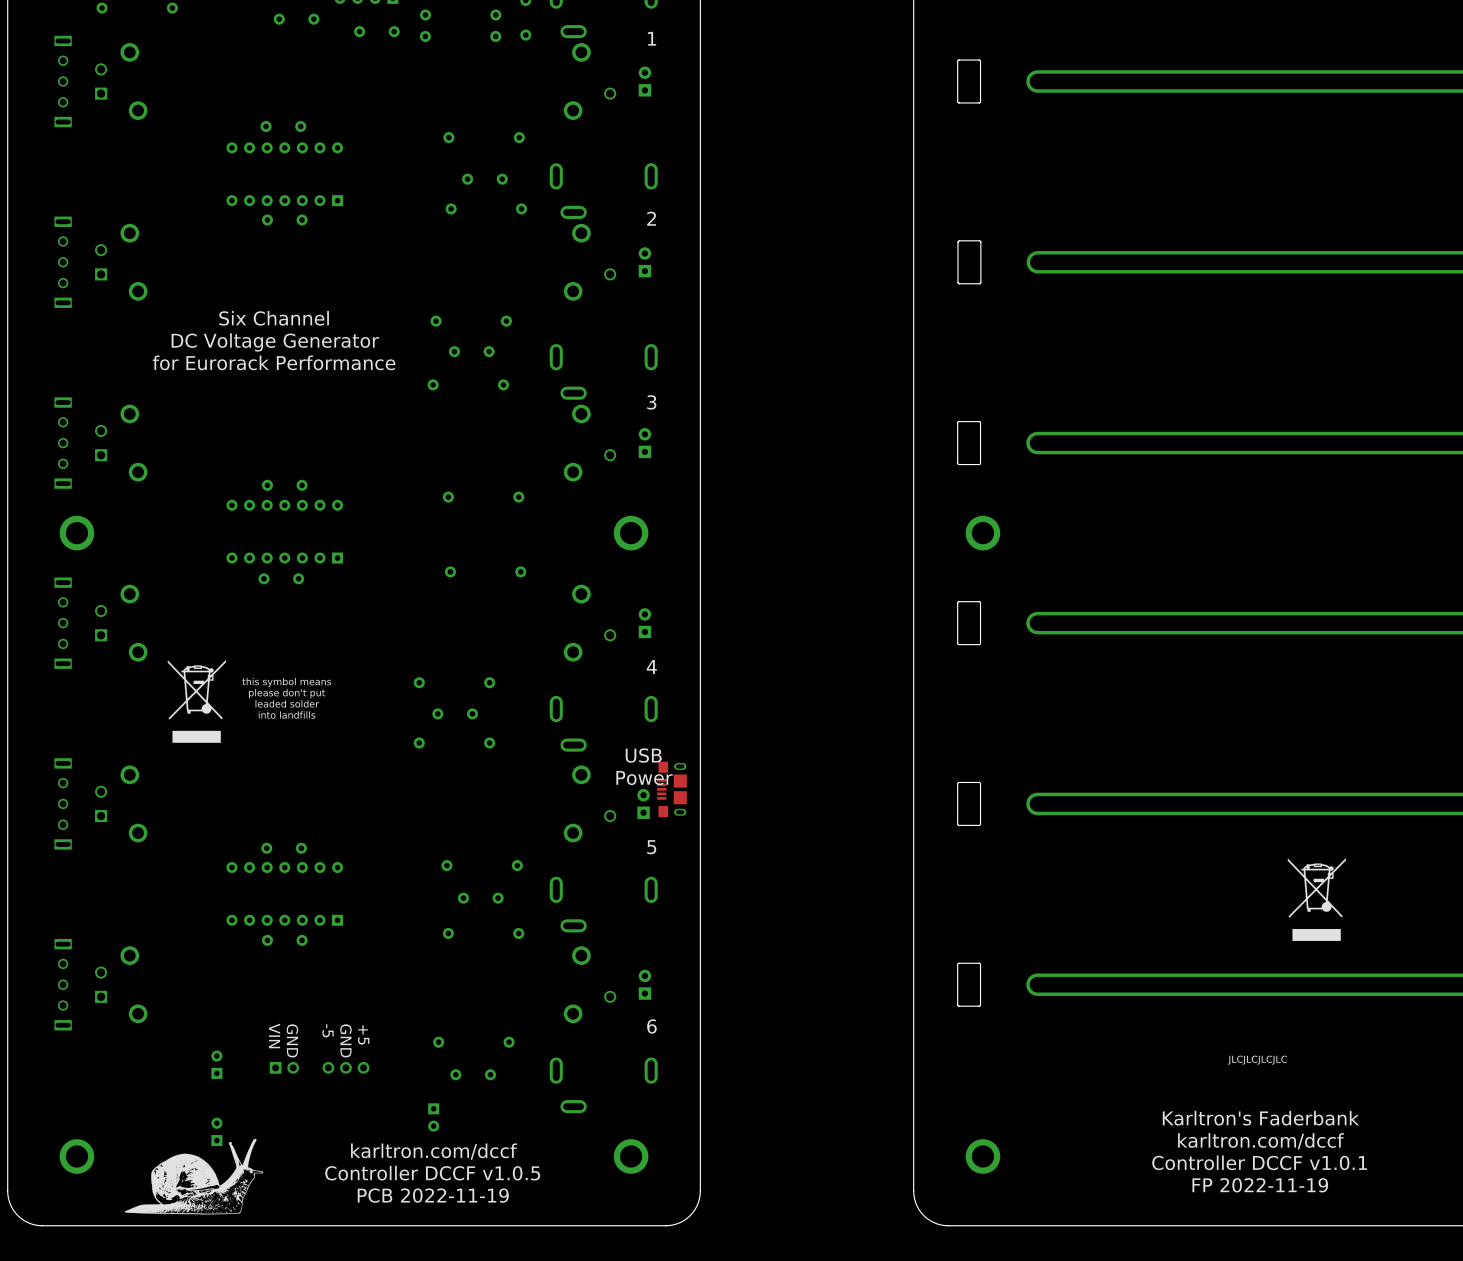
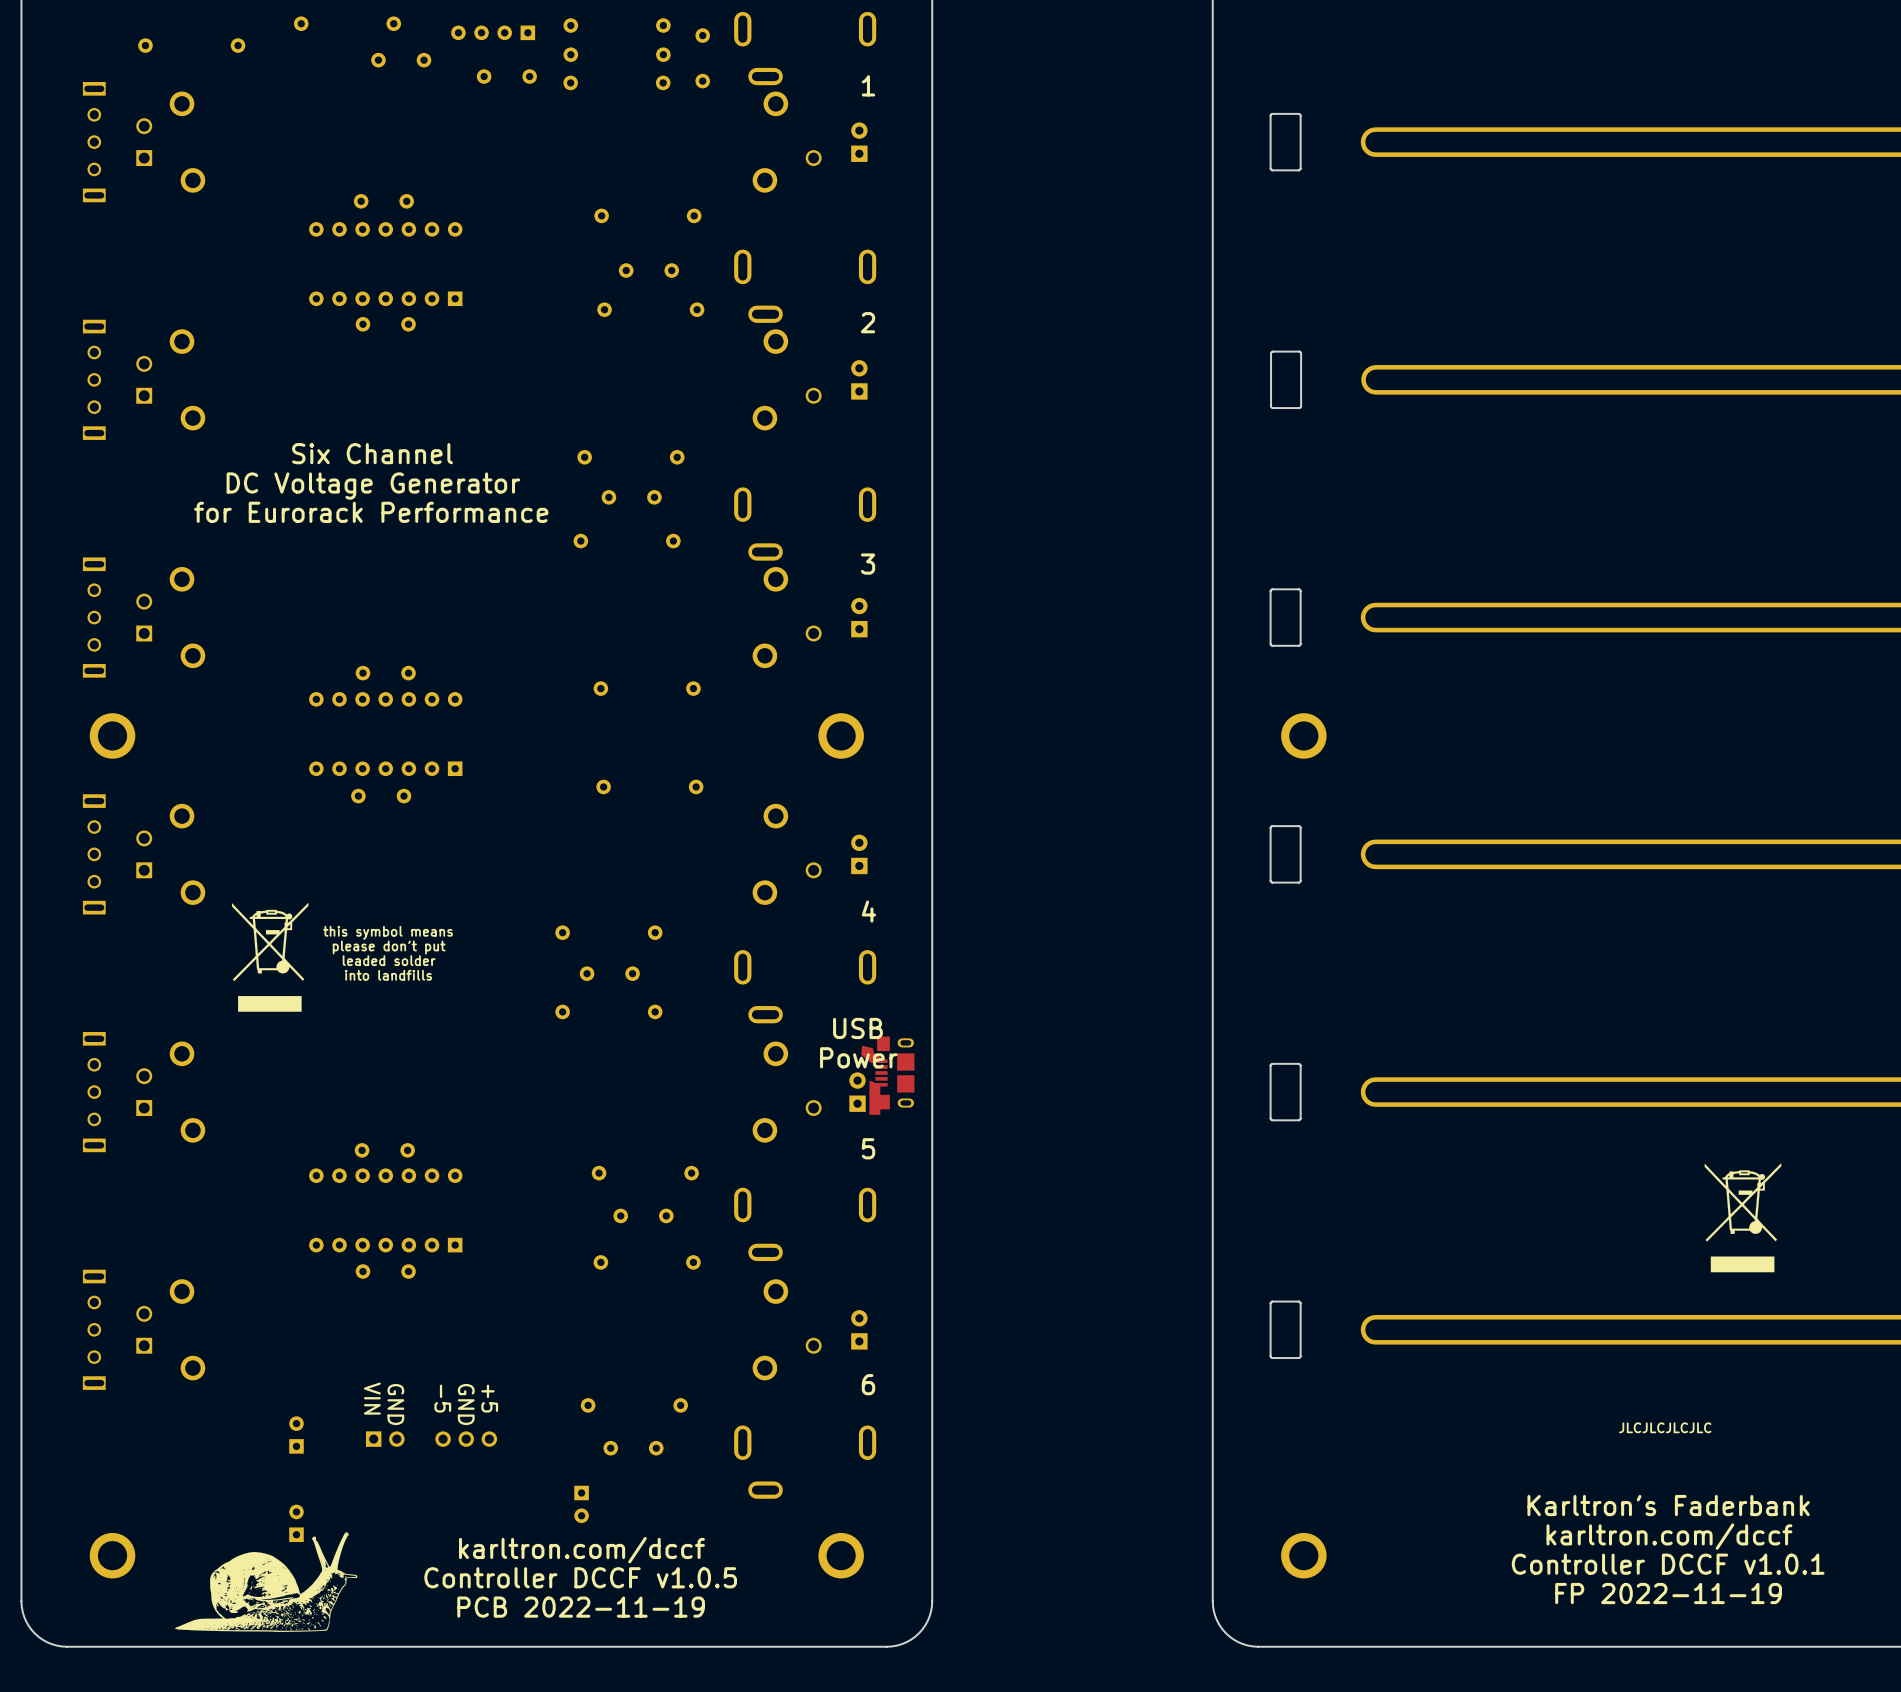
drawing: none -> [861, 1045, 881, 1063]
drawing: none -> [869, 1081, 881, 1115]

